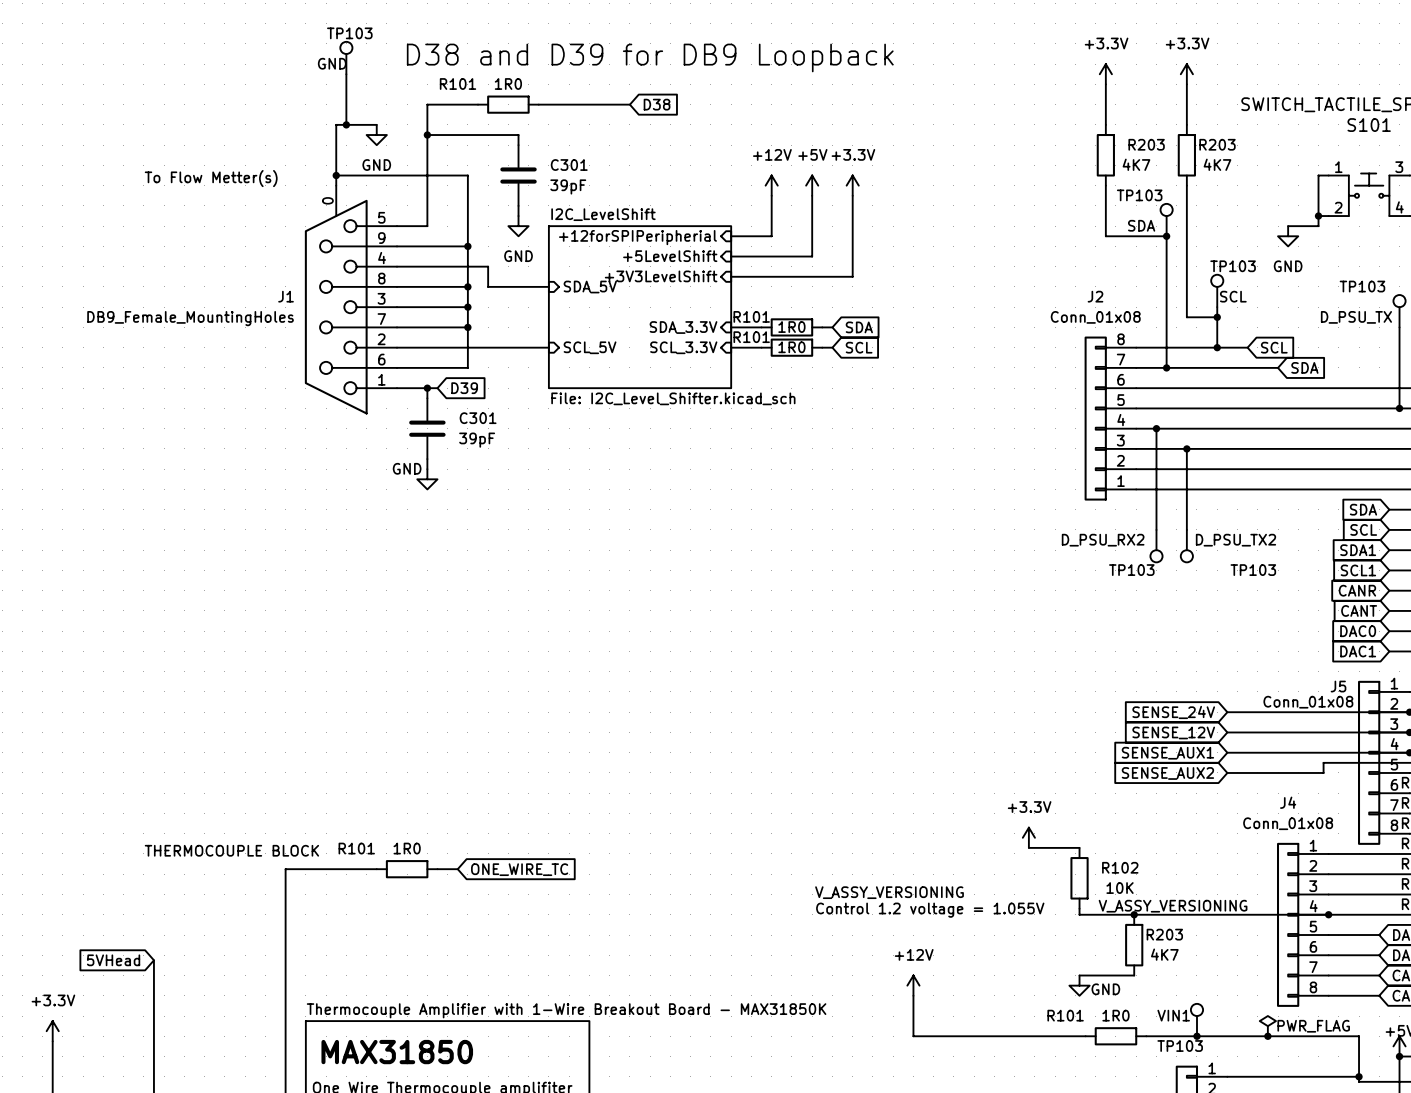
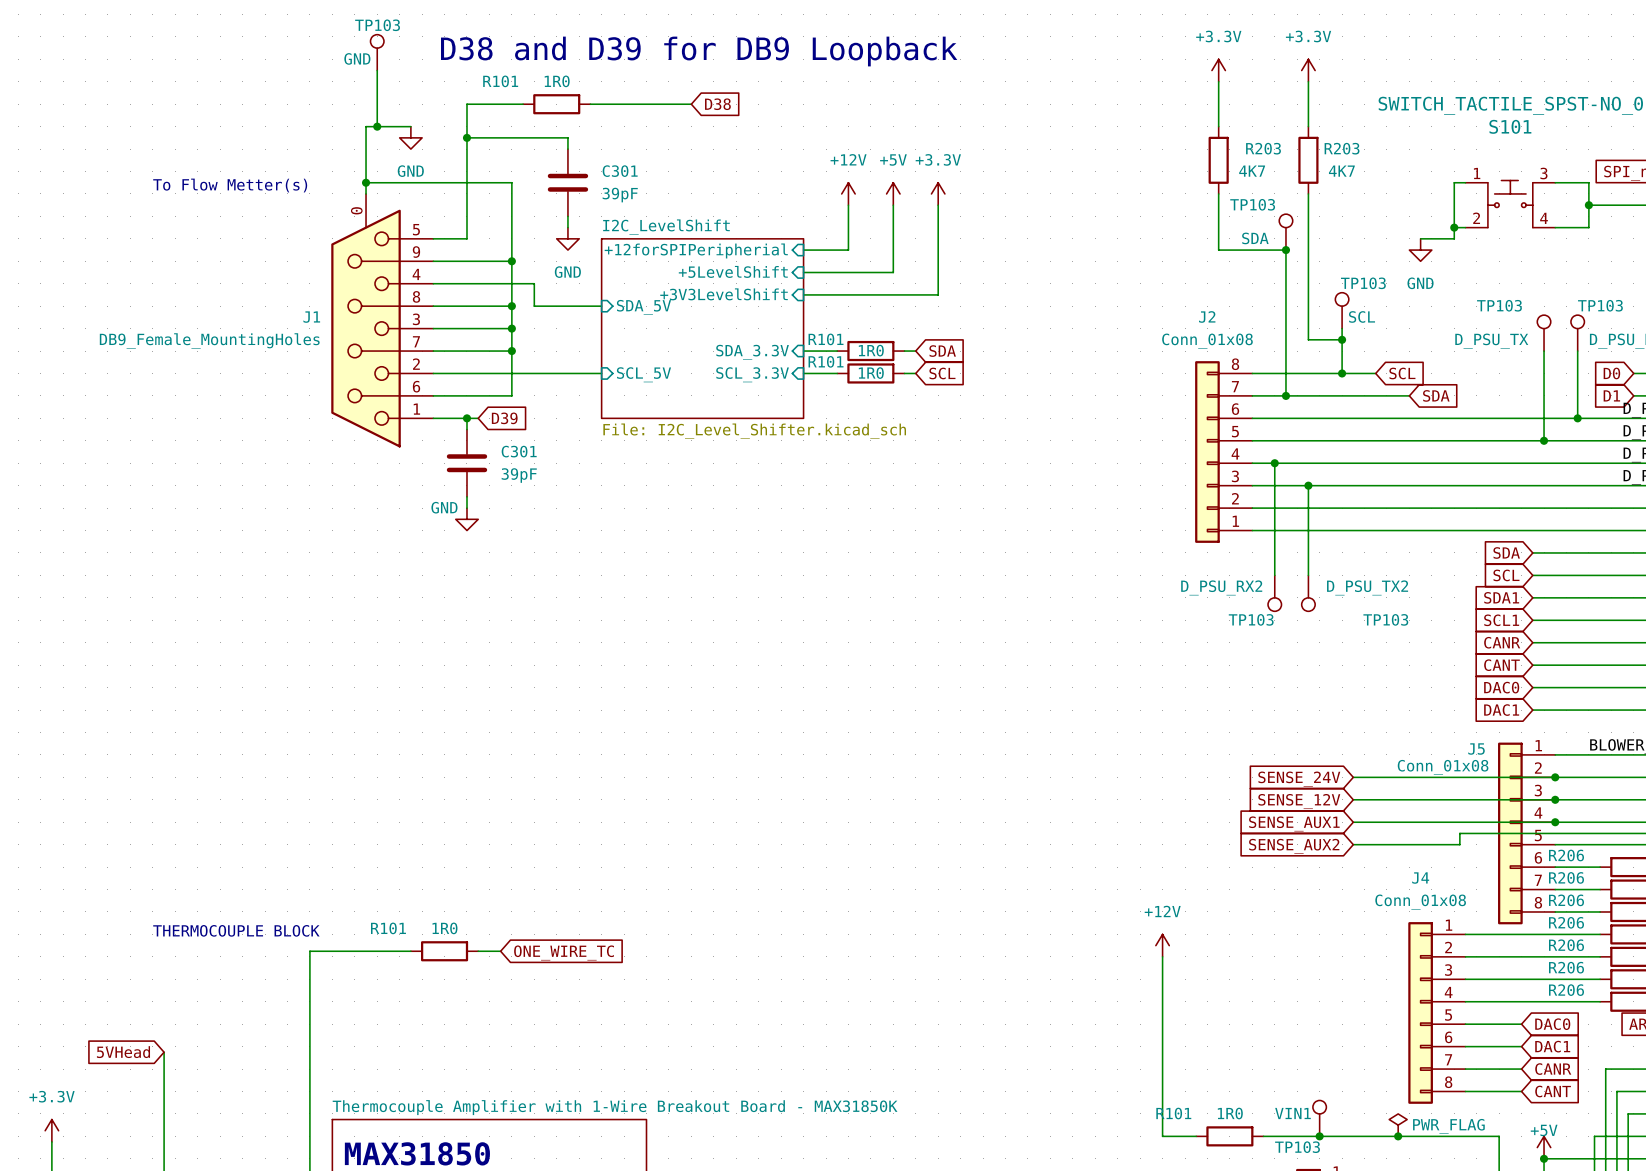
power symbol: +3.3V (1028, 837) -> none
wire: (1028, 847) (1079, 847) -> none
R102: 10K (1079, 878) -> none
text: V_ASSY_VERSIONING (889, 892) -> none
label: V_ASSY_VERSIONING (1173, 906) -> none
wire: (1079, 908) (1079, 914) (1328, 914) -> none
text: Control 1.2 voltage = 1.055V (930, 910) -> none
junction: (1134, 914) -> none
junction: (1328, 914) -> none
R203: 4K7 (1134, 945) -> none
wire: (1079, 975) (1134, 975) -> none
power symbol position: +12V (913, 985) -> +12V (1162, 945)
power symbol: GND (1079, 985) -> none
wire: (913, 995) (913, 1036) (1055, 1036) -> (1162, 956) (1162, 1136)

